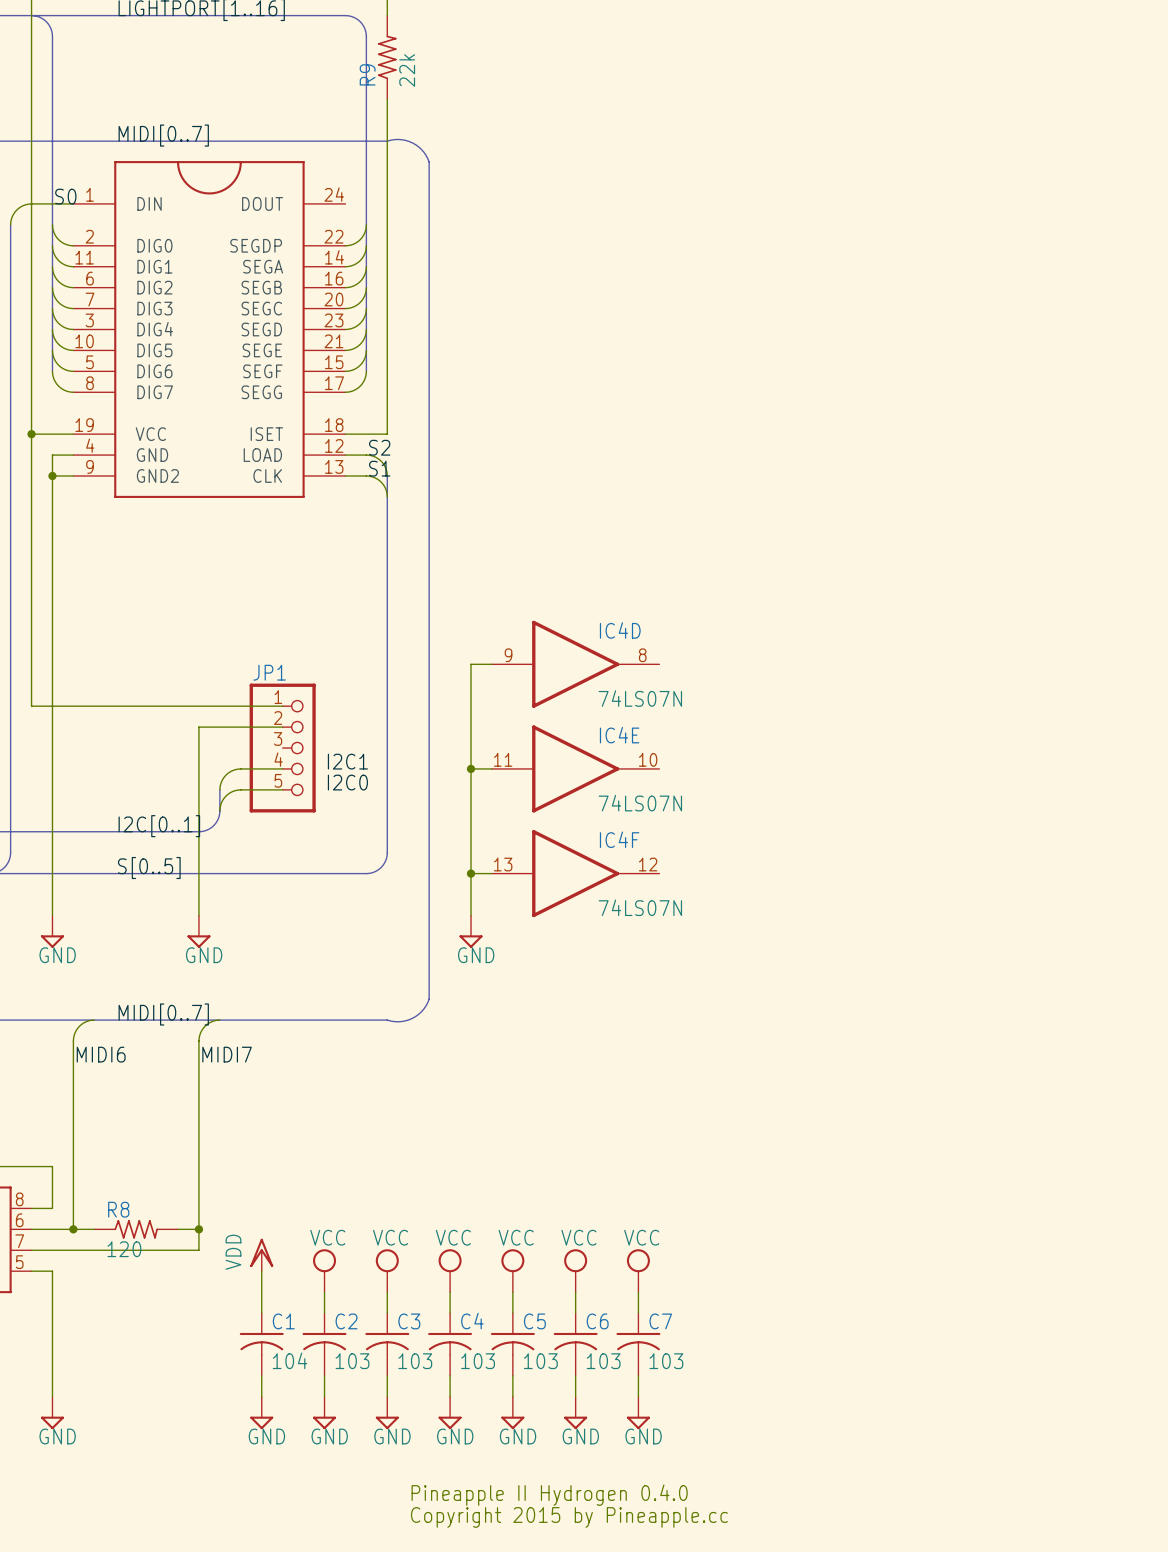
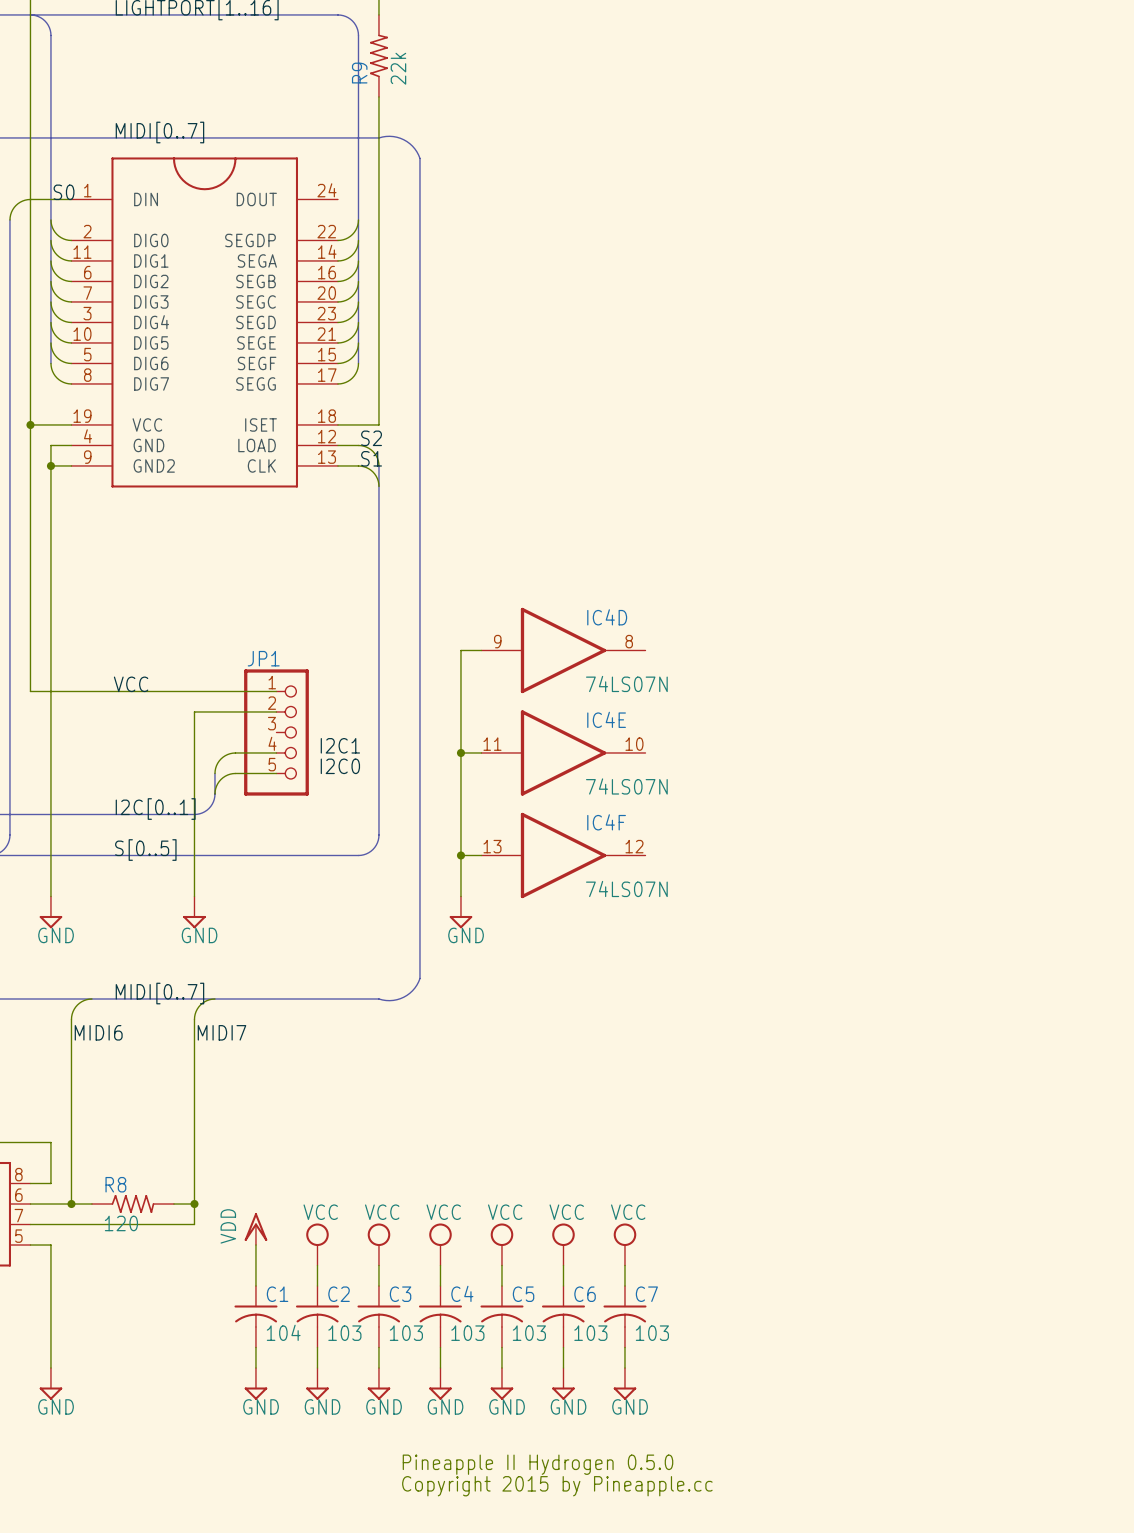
label: none -> VCC (131, 684)
text: Pineapple II Hydrogen 0.4.0 (549, 1495) -> Pineapple II Hydrogen 0.5.0 (538, 1464)

